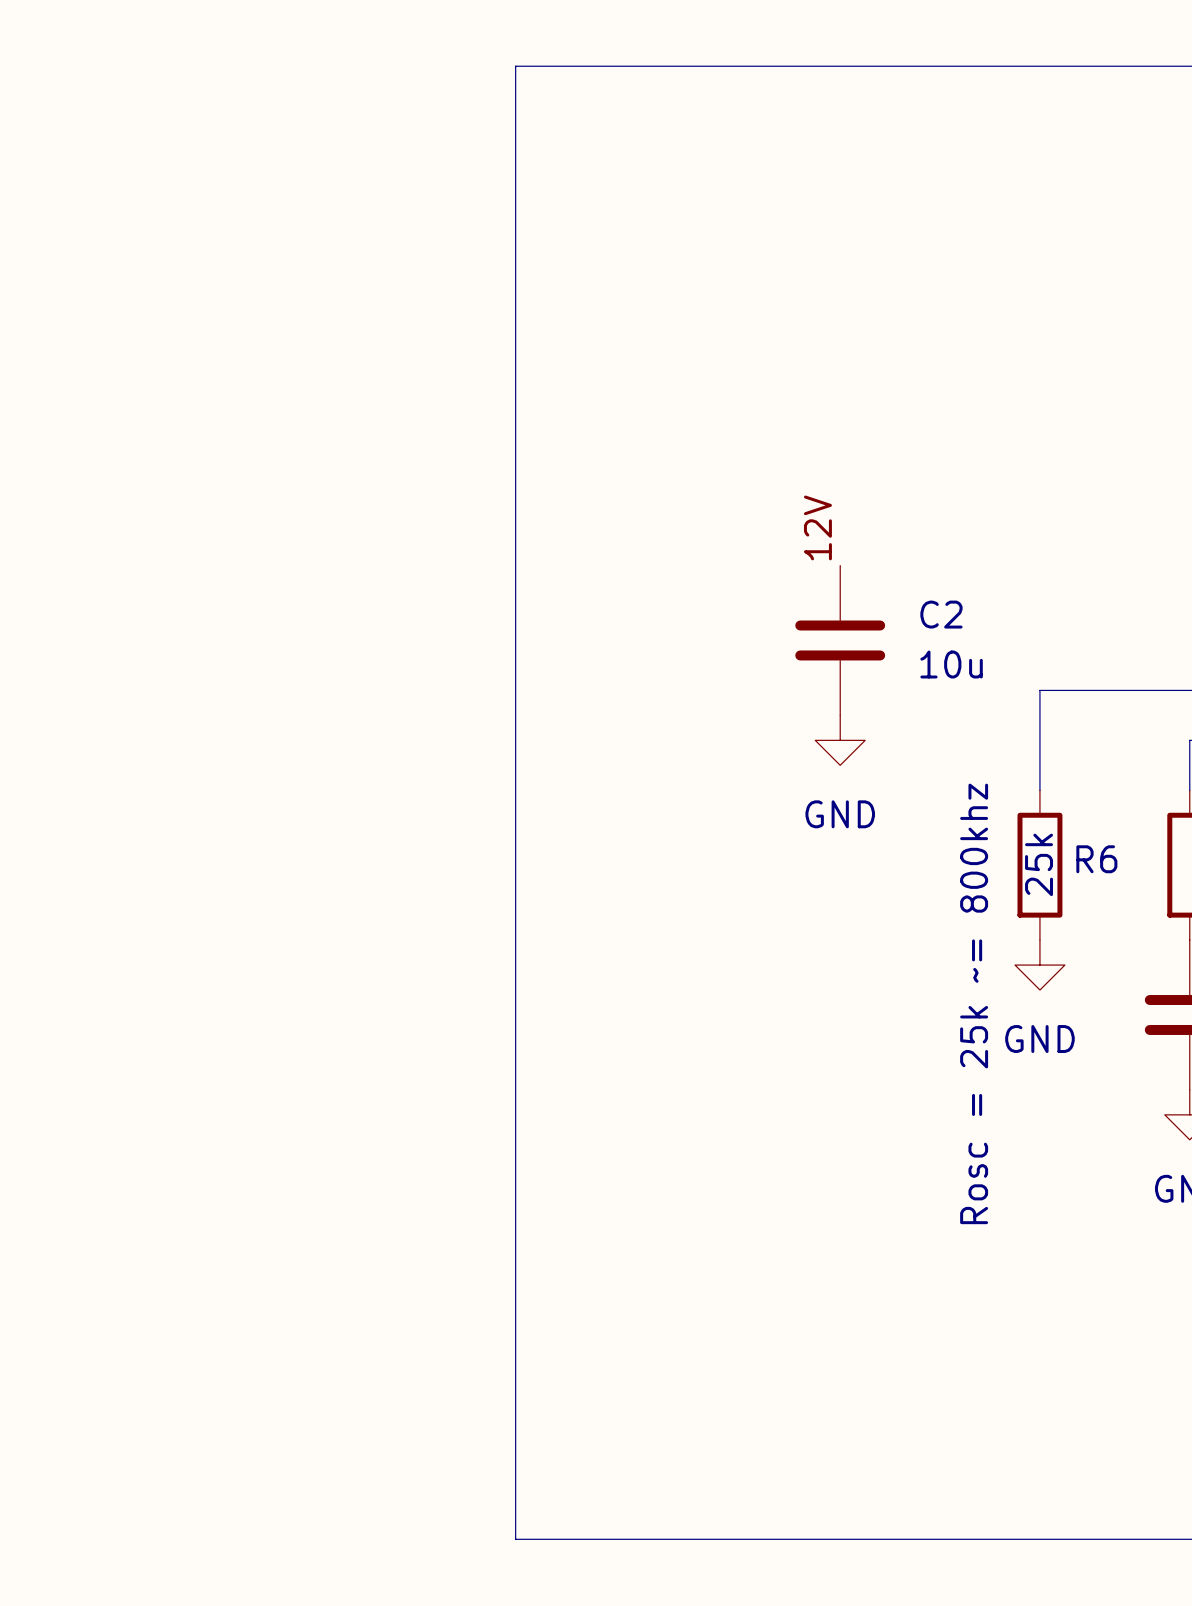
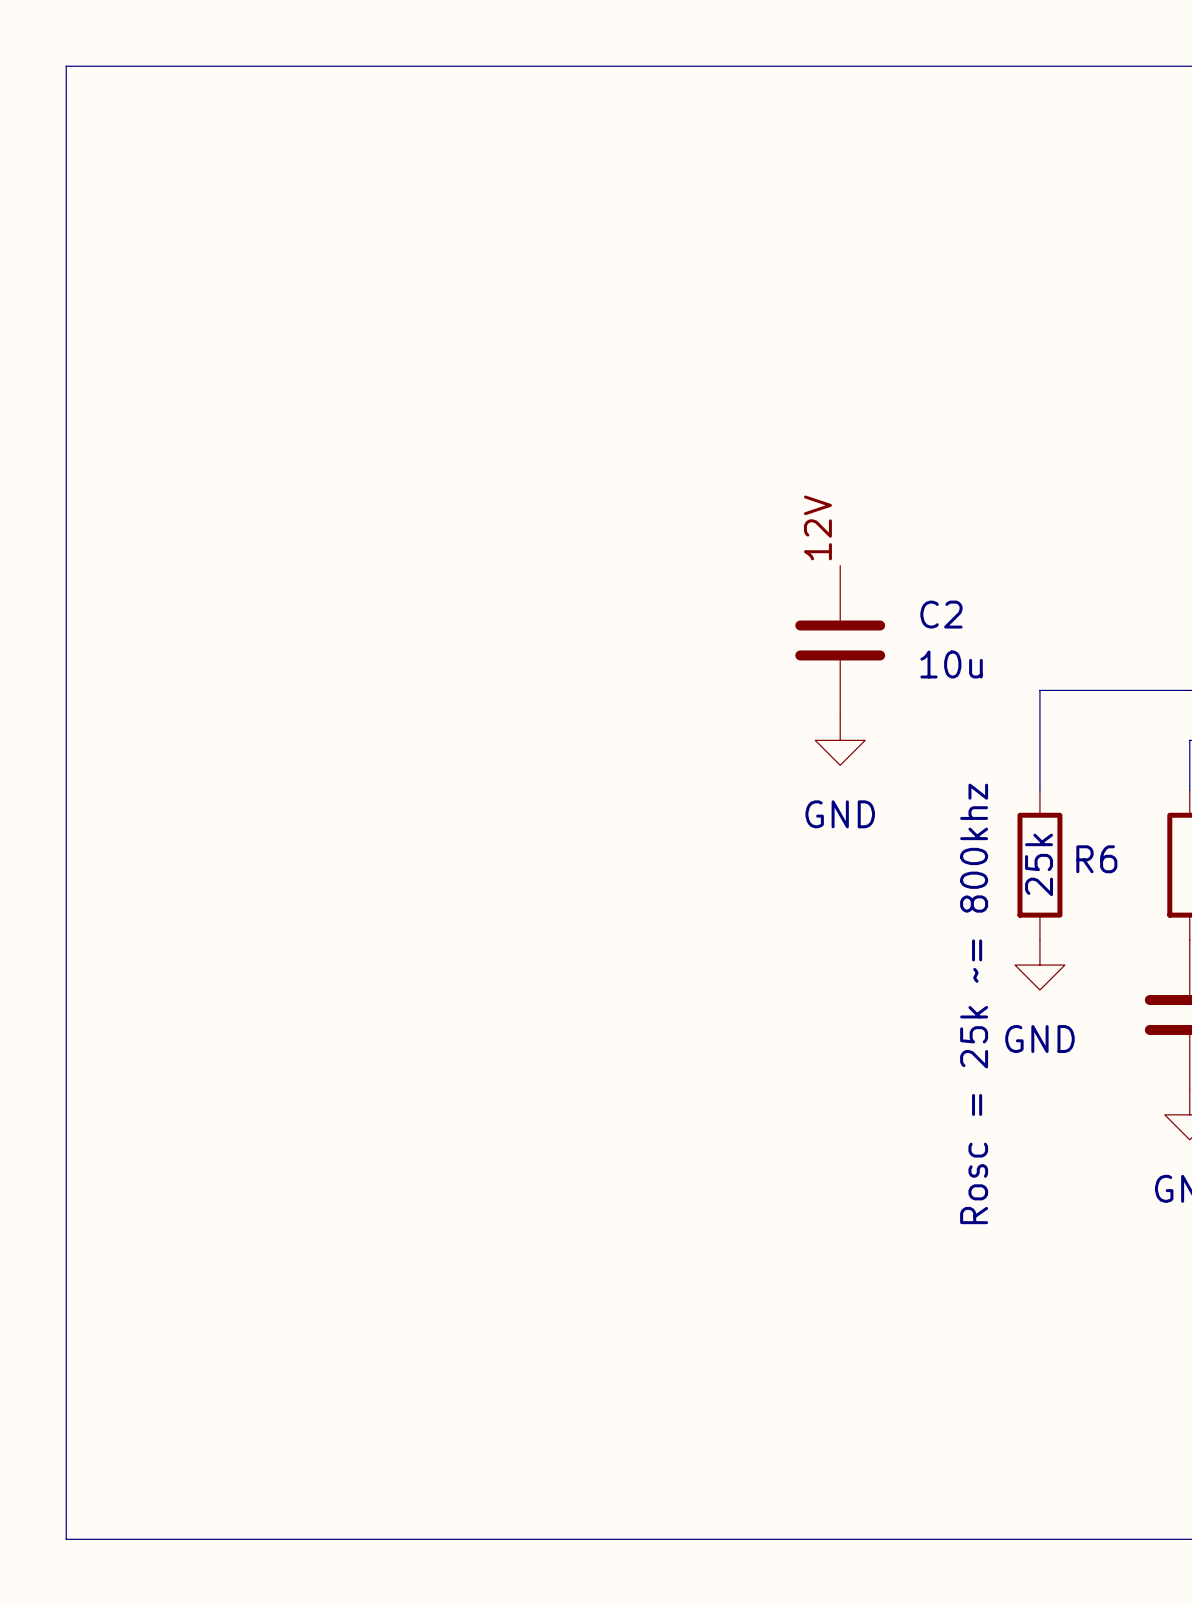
line: (515, 66) (515, 1539) -> (515, 66) (66, 66) (66, 1539) (515, 1539)

